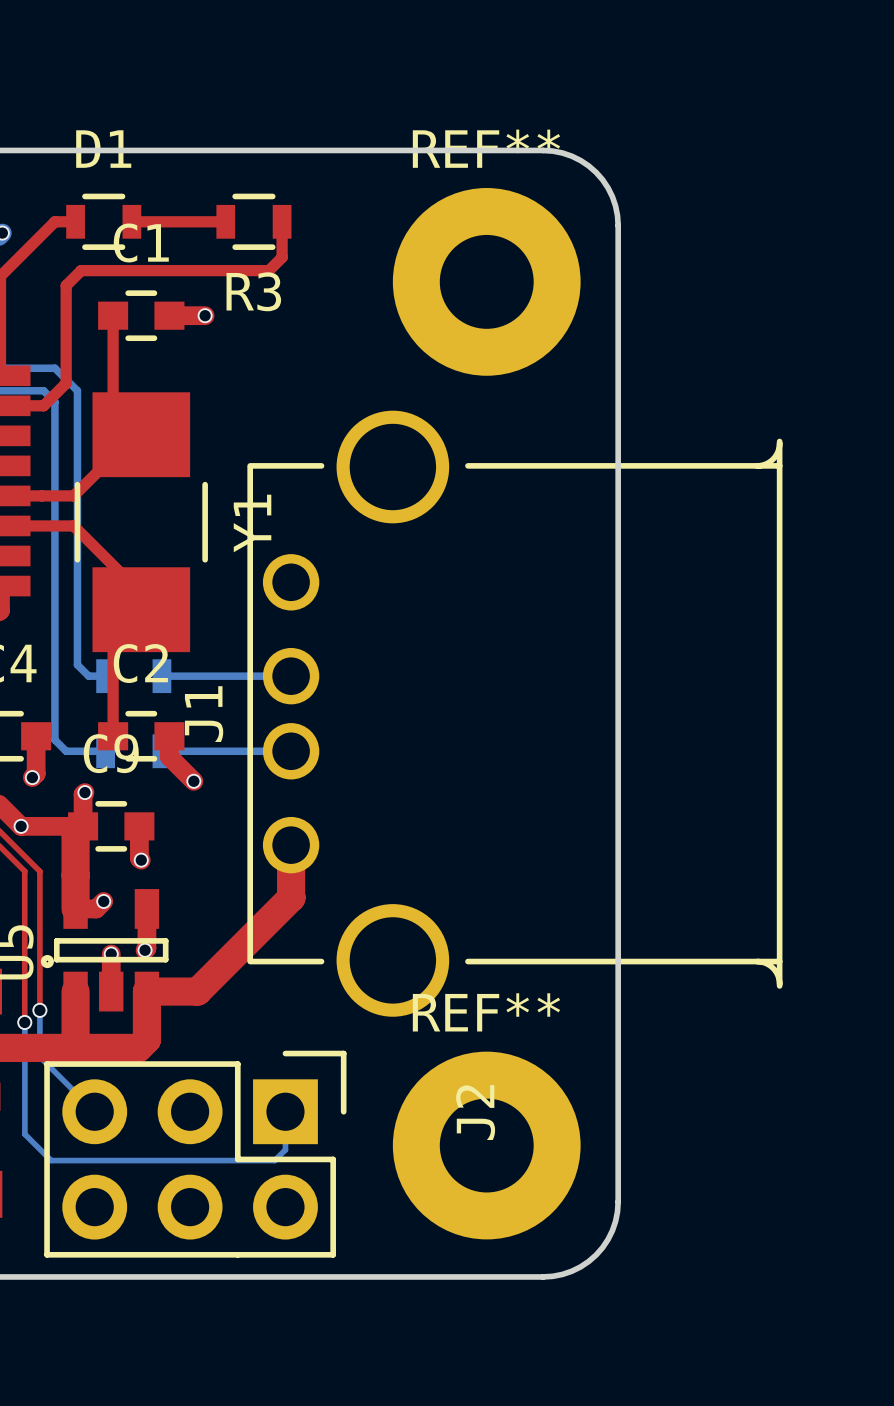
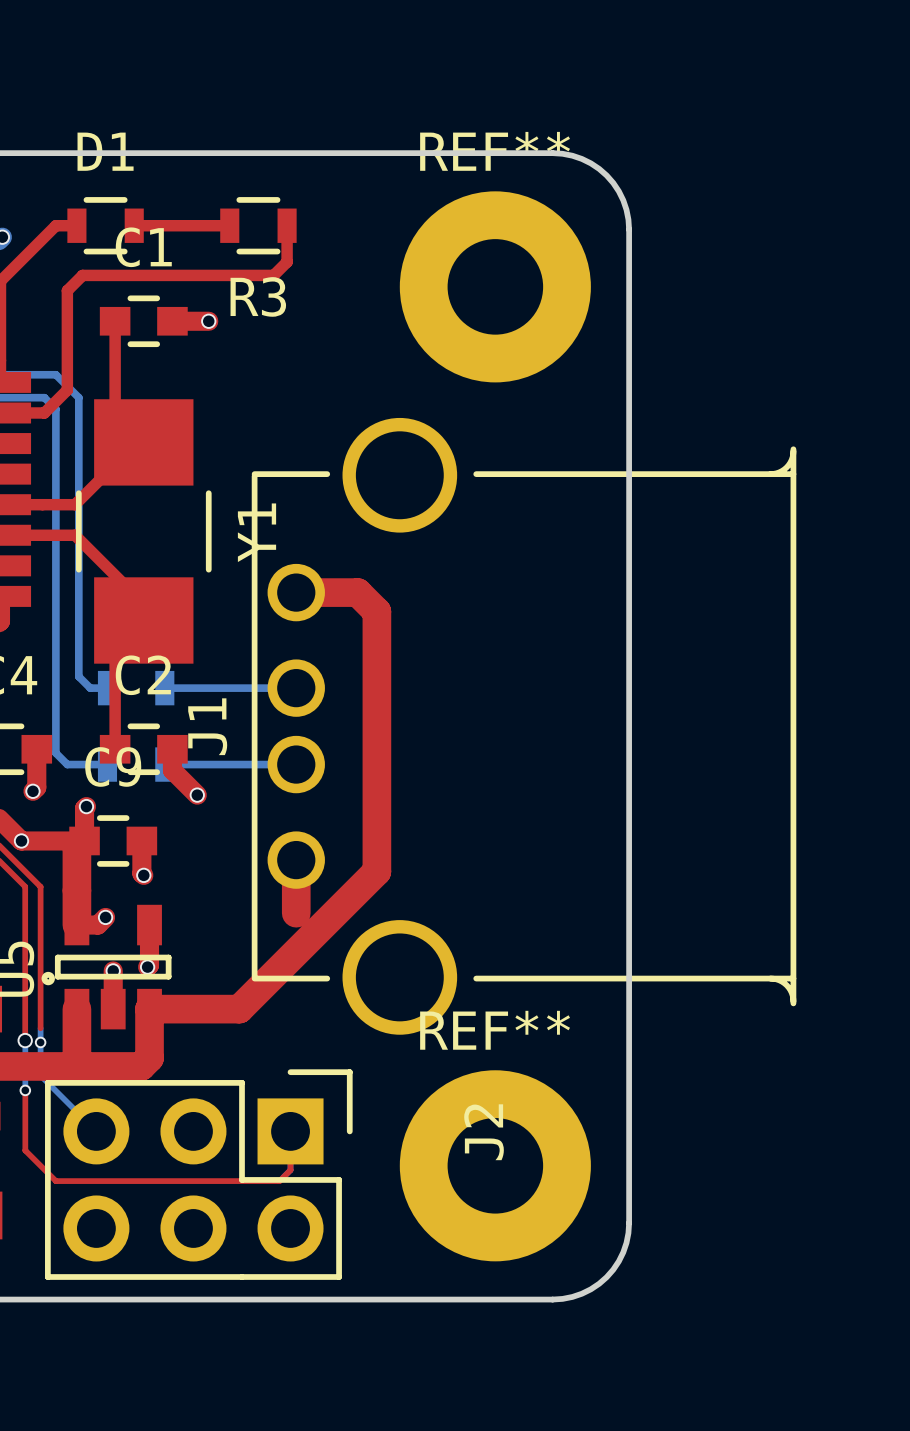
top track: (291, 897) (197, 991) -> (296, 592) (357, 592) (376, 611) (376, 871) (239, 1009) (201, 1009)
via: (39, 1010) -> none
via: none -> (40, 1042)
top track: none -> (25, 1090) (25, 1150) (55, 1181) (279, 1181) (290, 1170) (290, 1131)
bottom track: (24, 1071) (24, 1134) (51, 1160) (274, 1160) (278, 1156) -> none
via: none -> (25, 1090)

